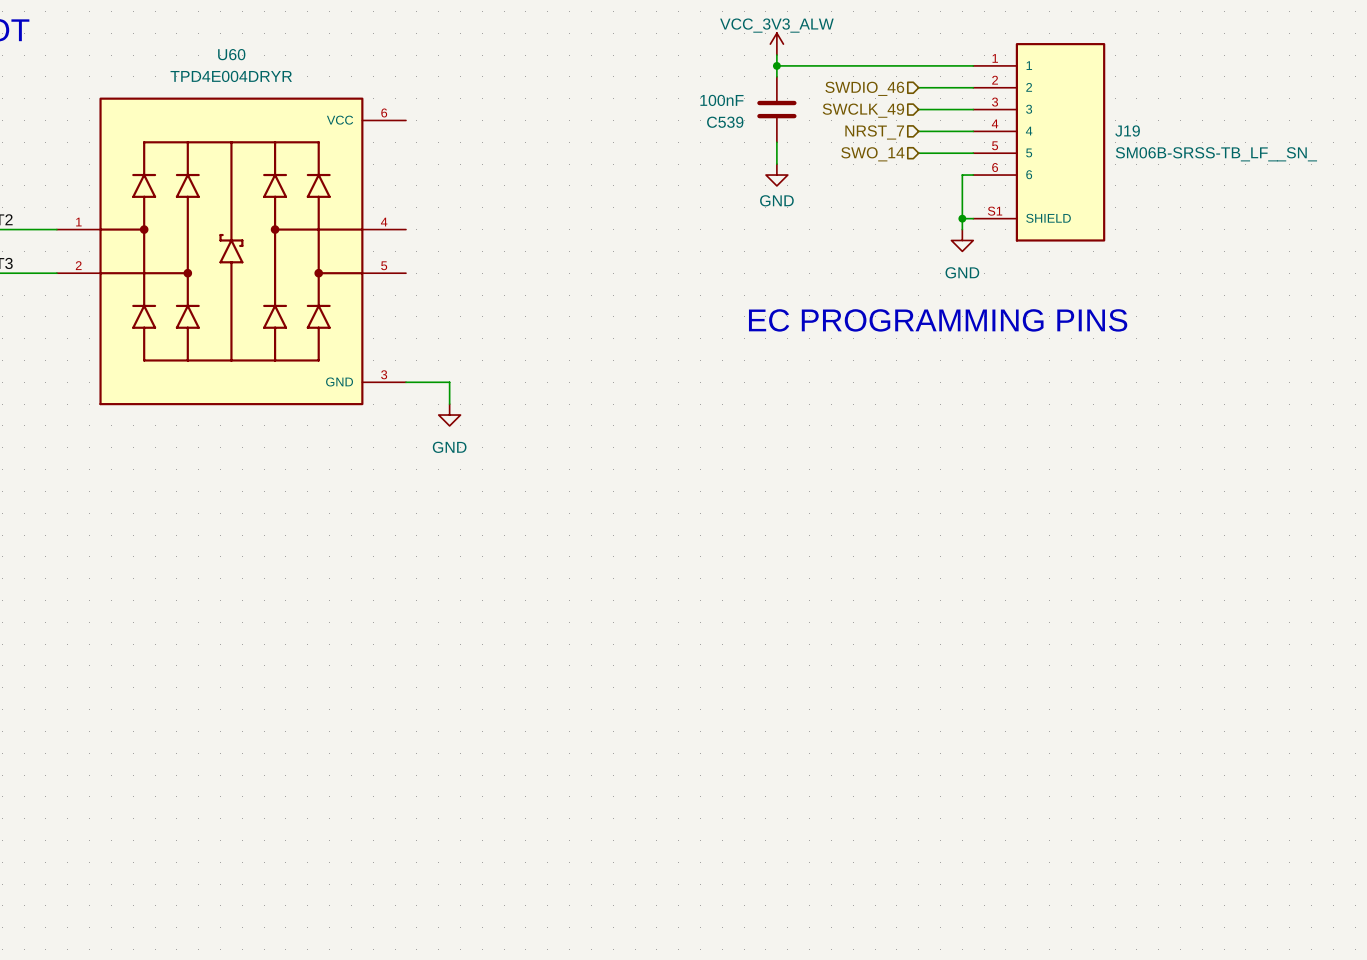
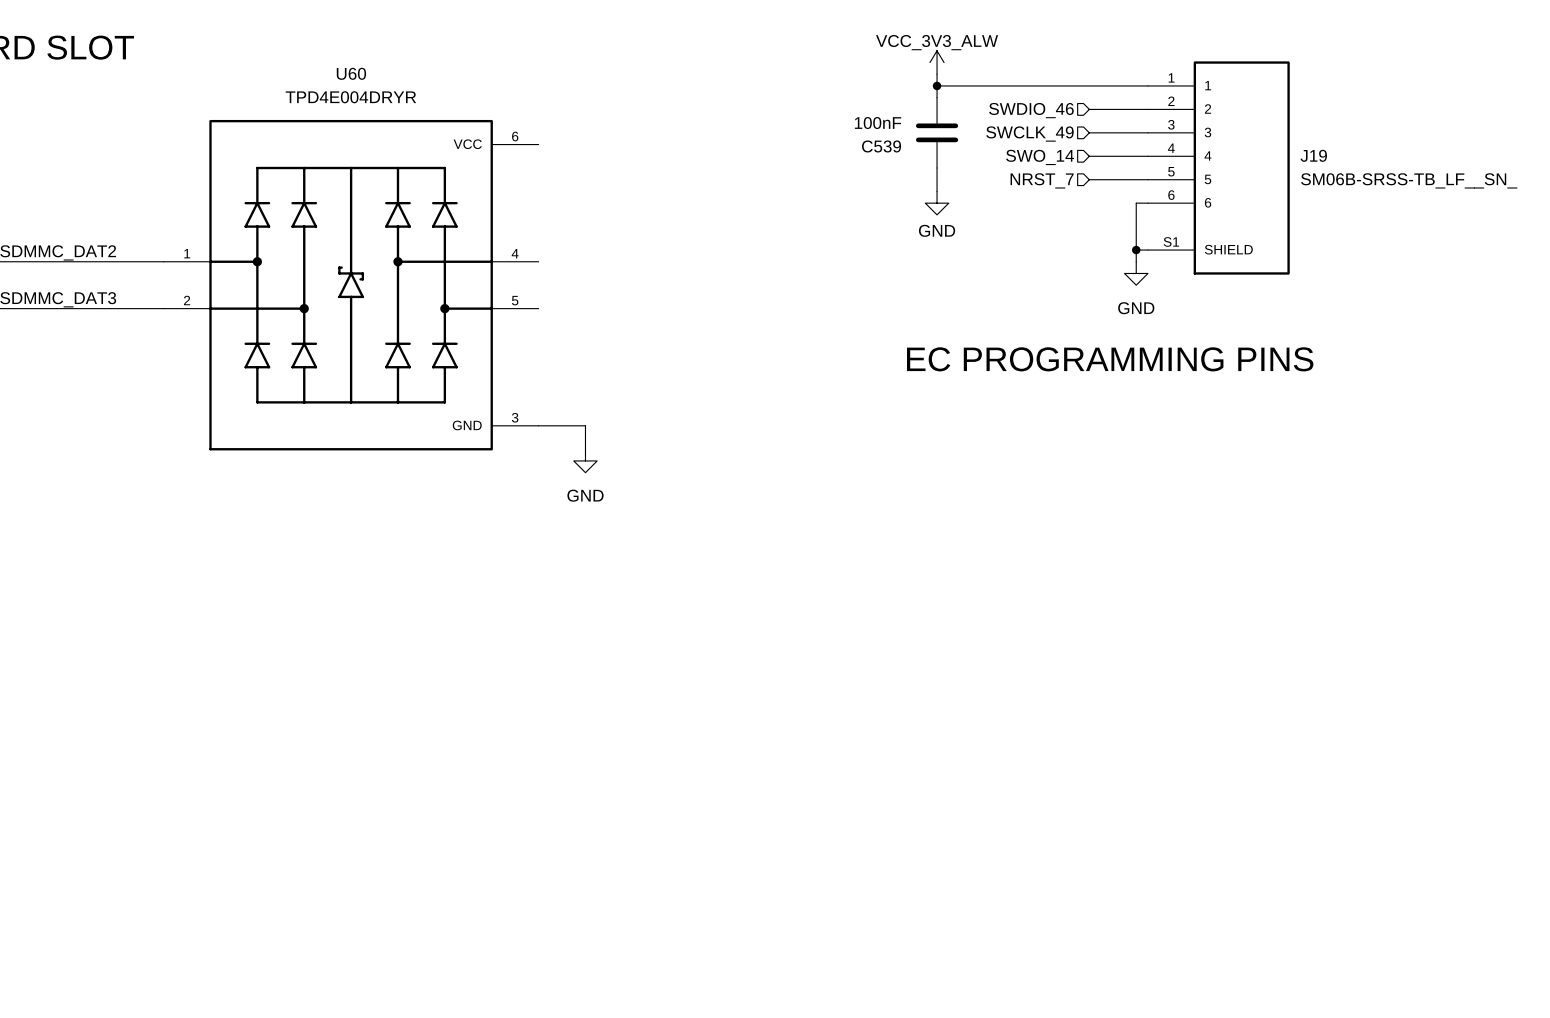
hierarchical label: NRST_7 (874, 132) -> SWO_14 (1040, 157)
hierarchical label: SWO_14 (872, 154) -> NRST_7 (1042, 180)

